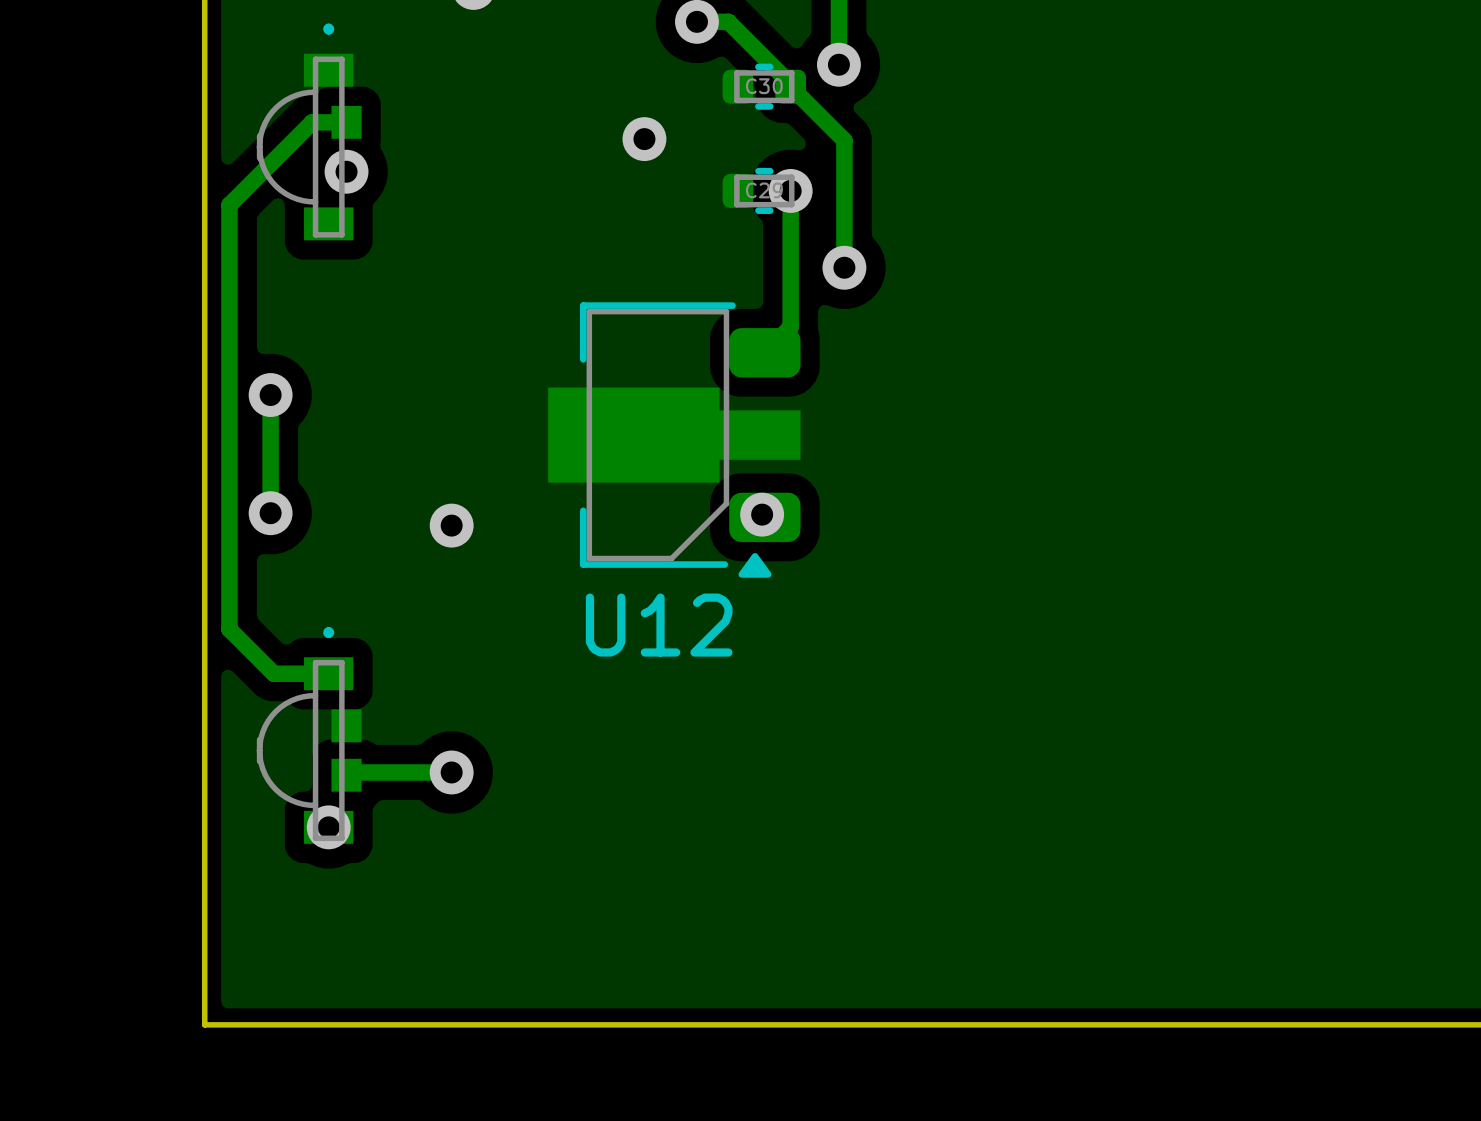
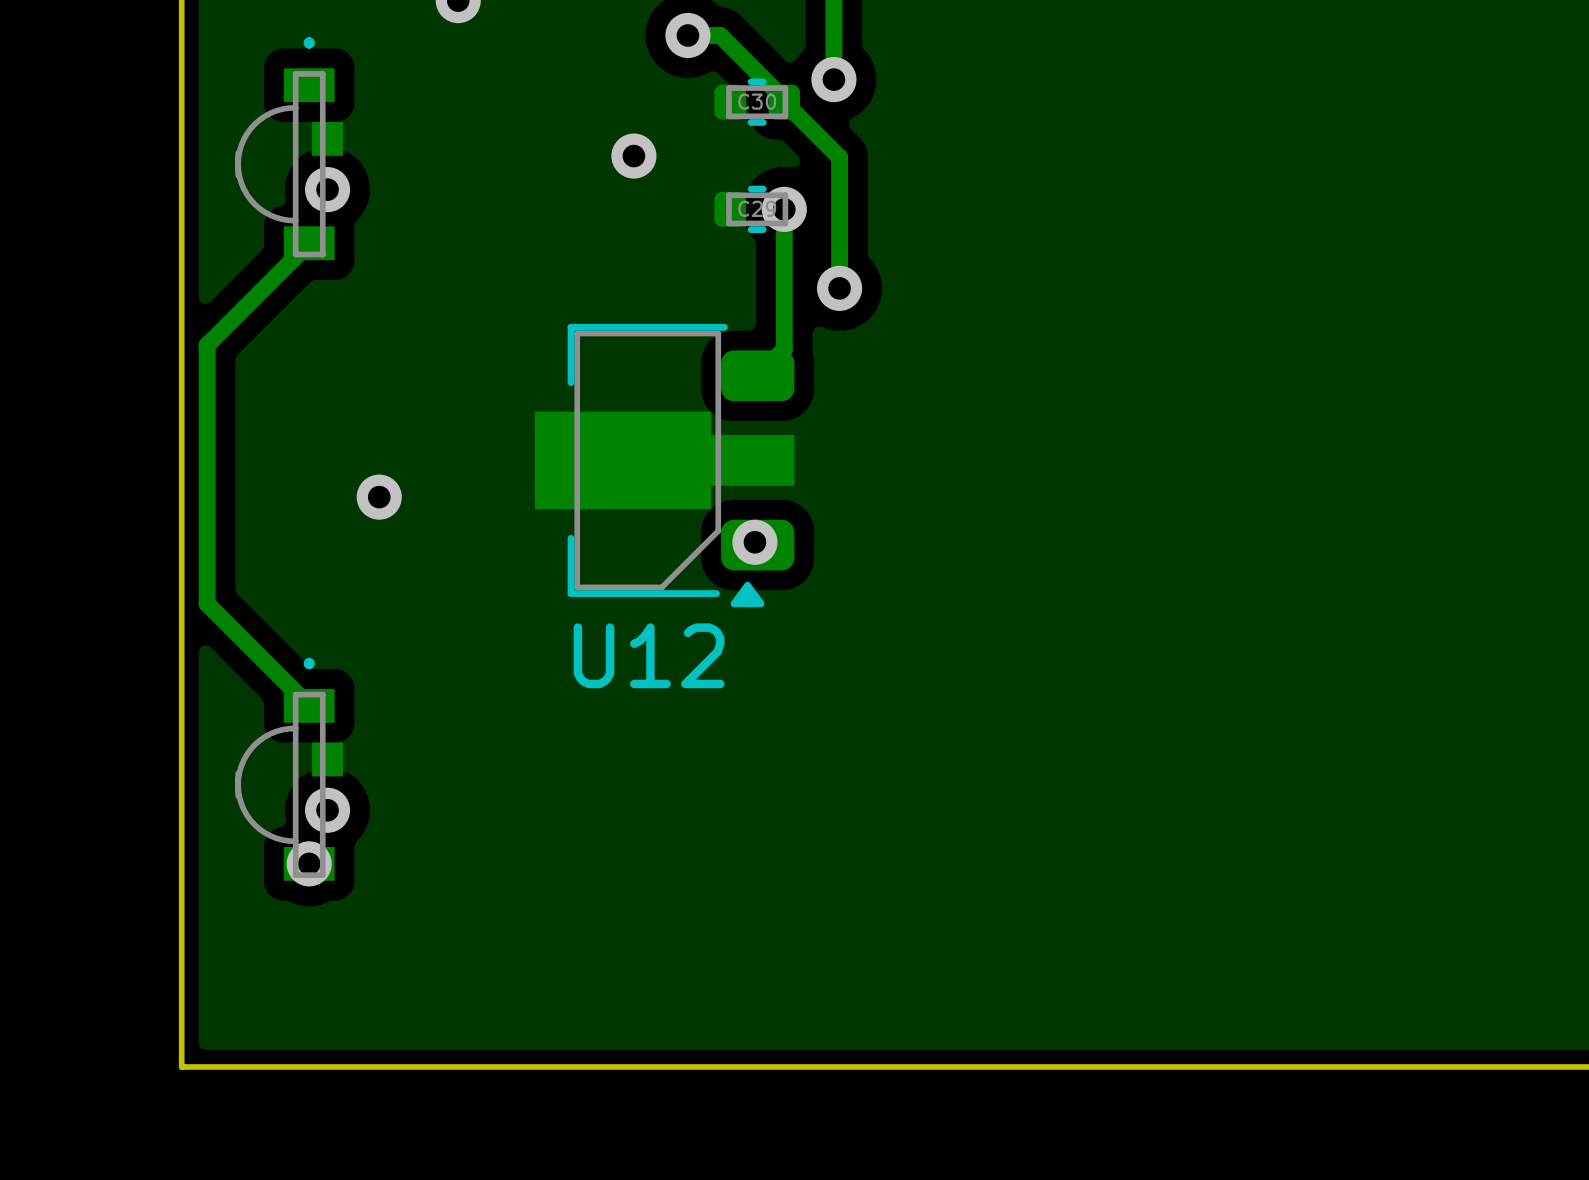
track: (346, 122) (312, 122) (229, 205) (229, 323) -> (309, 243) (207, 345)
track: (270, 395) (270, 513) -> none
via: (270, 395) -> none
via: none -> (379, 497)
via: (270, 513) -> none
via: (451, 525) -> none
track: (229, 574) (229, 629) (273, 673) (328, 673) -> (207, 603) (309, 705)
track: (451, 772) (349, 772) -> none
via position: (451, 772) -> (327, 810)

